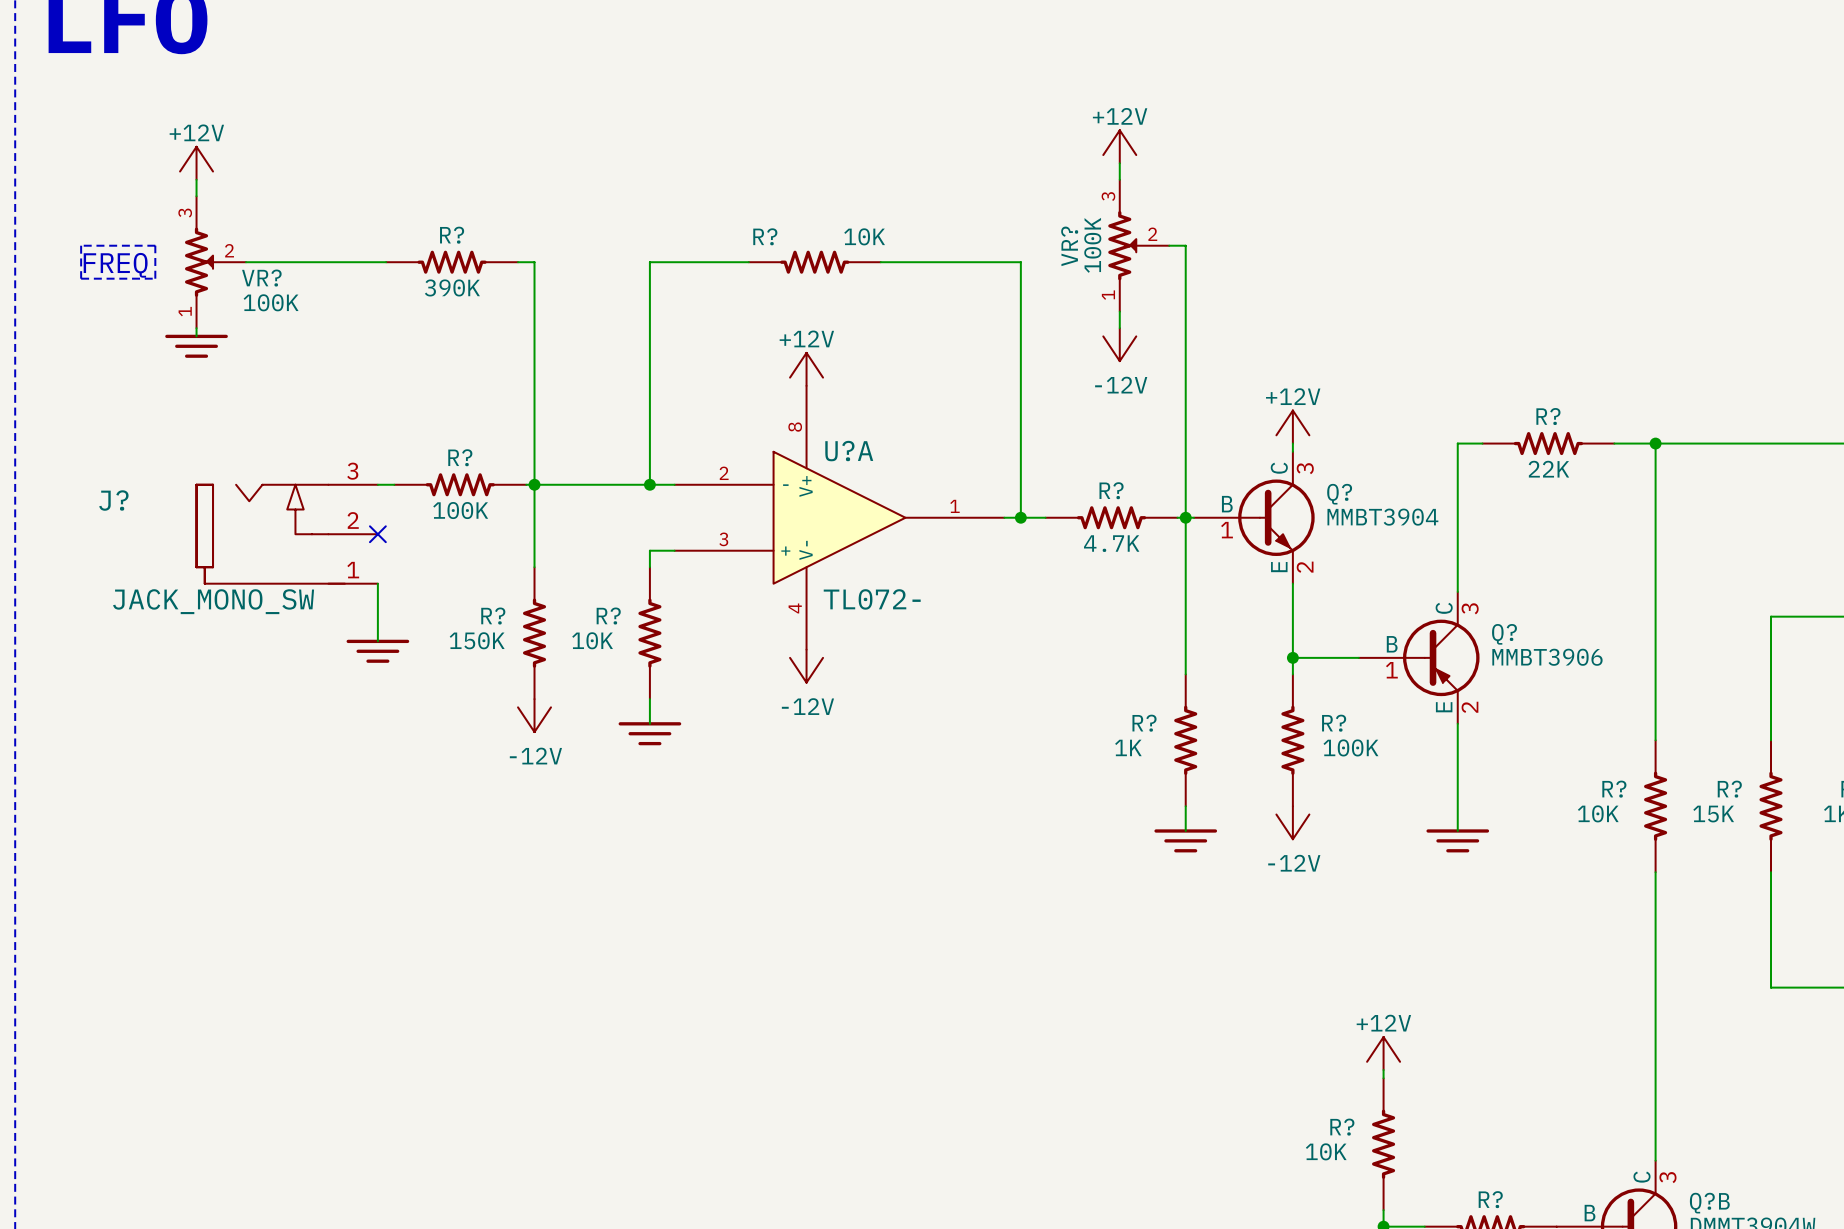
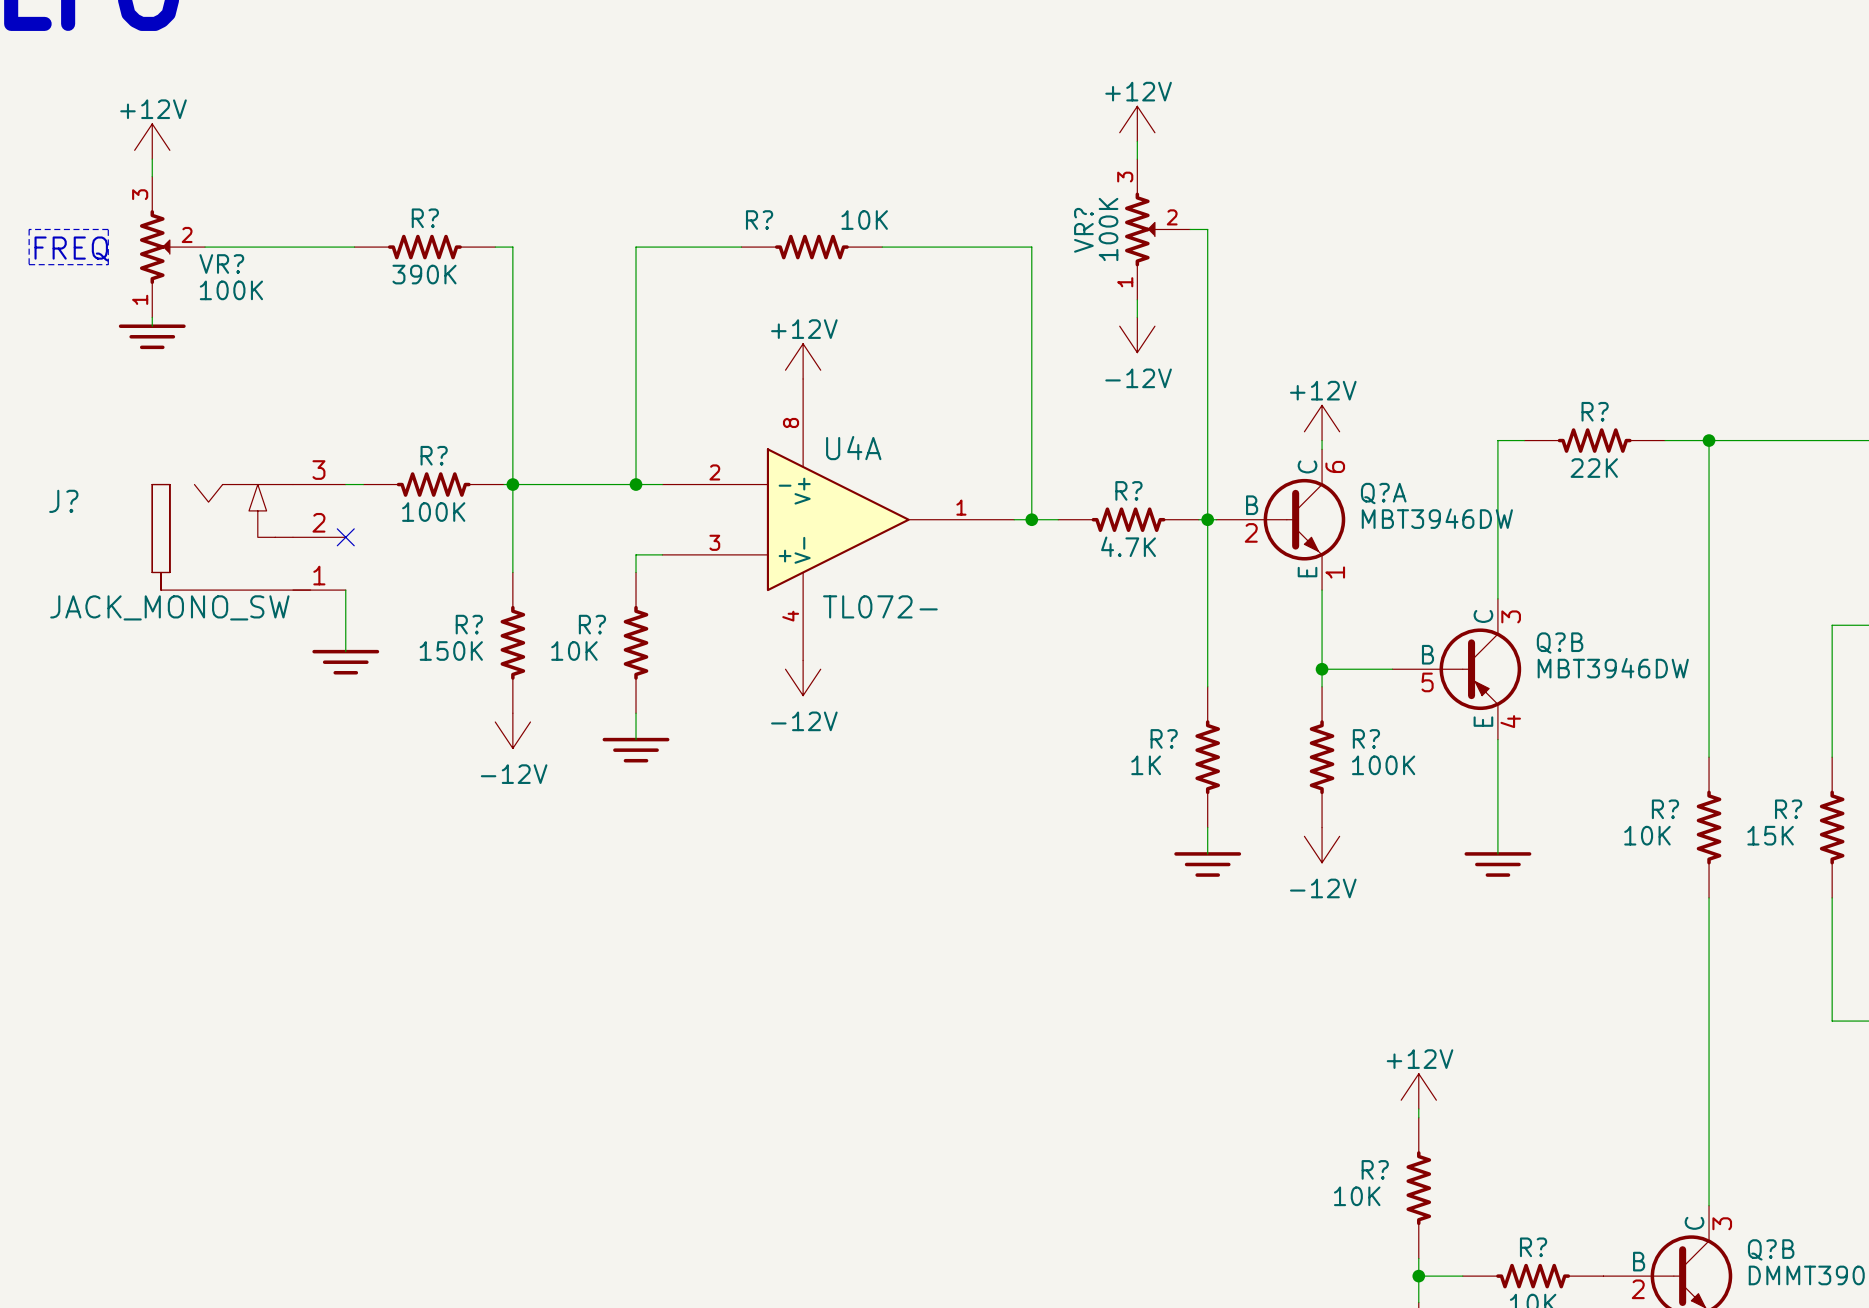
U?A name: U?A (849, 451) -> U4A (853, 448)
Q?: MMBT3904 (1254, 517) -> none
Q?A: none -> MBT3946DW (1280, 519)
Q?: MMBT3906 (1419, 657) -> none
Q?B: none -> MBT3946DW (1456, 669)

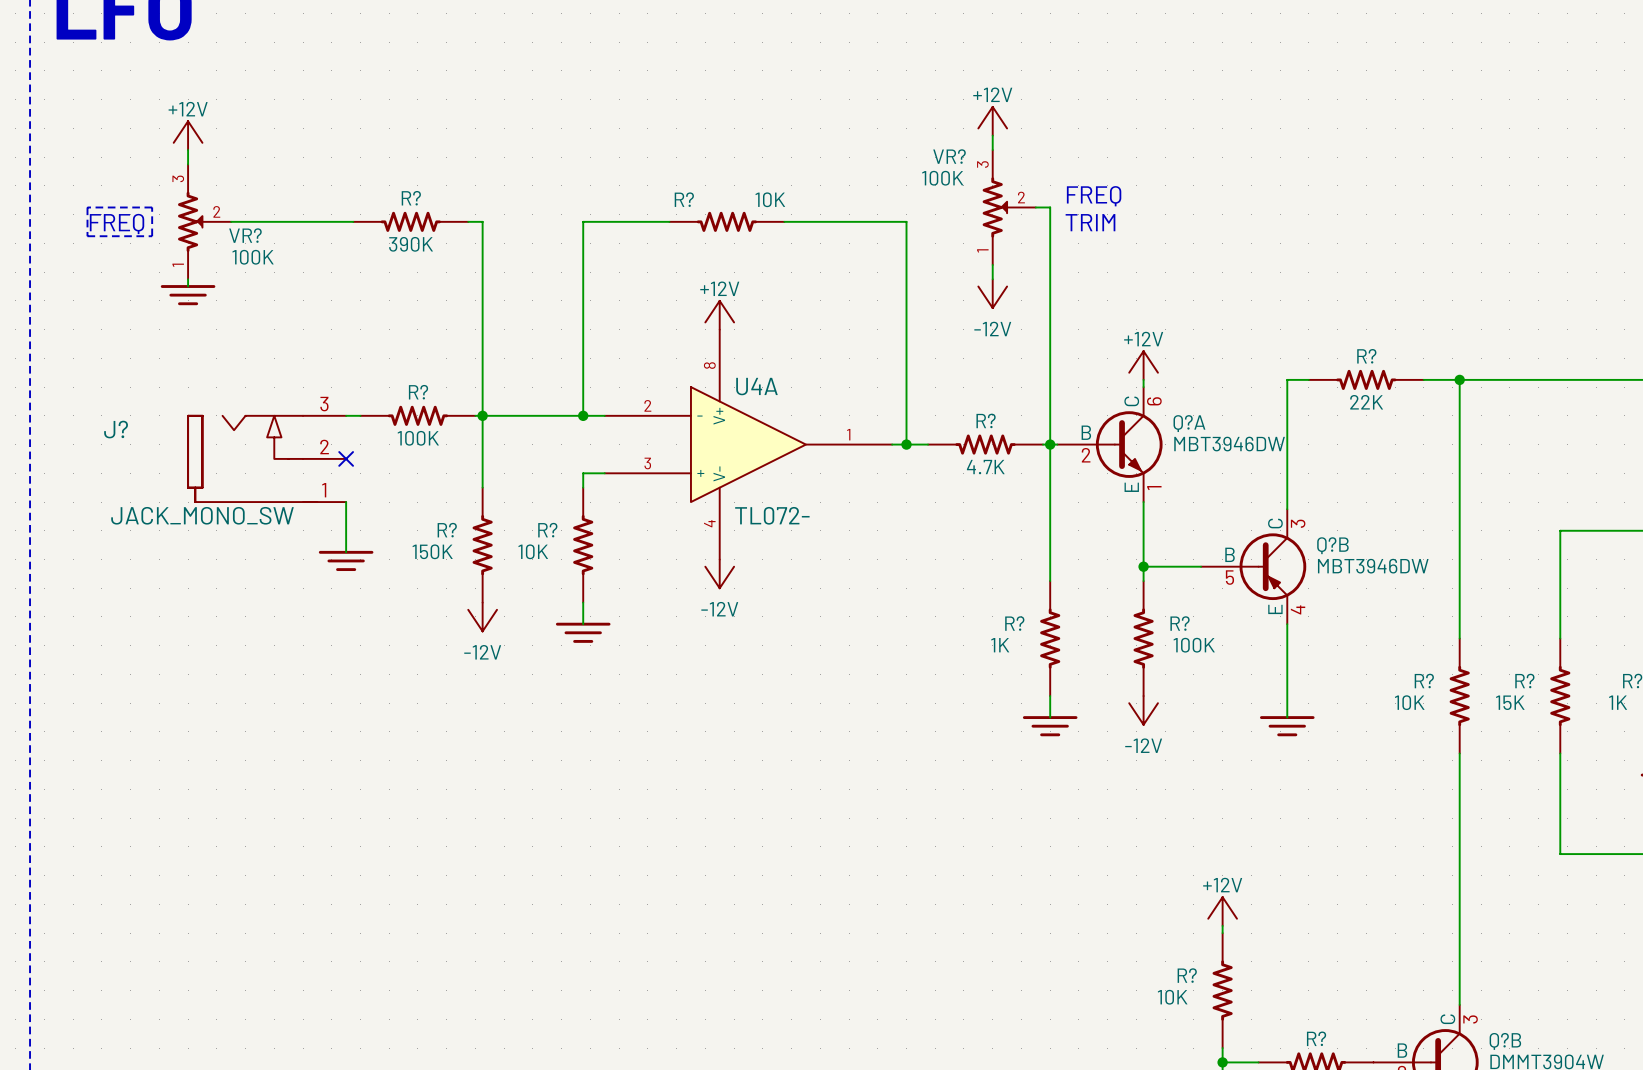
text: none -> FREQ (1094, 196)
VR? value rotation: 0° (1108, 229) -> 90° clockwise (942, 178)
VR? name rotation: 0° (1083, 230) -> 90° clockwise (949, 156)
VR? name position: VR? (1083, 230) -> VR? (949, 156)
text: none -> TRIM (1090, 222)

